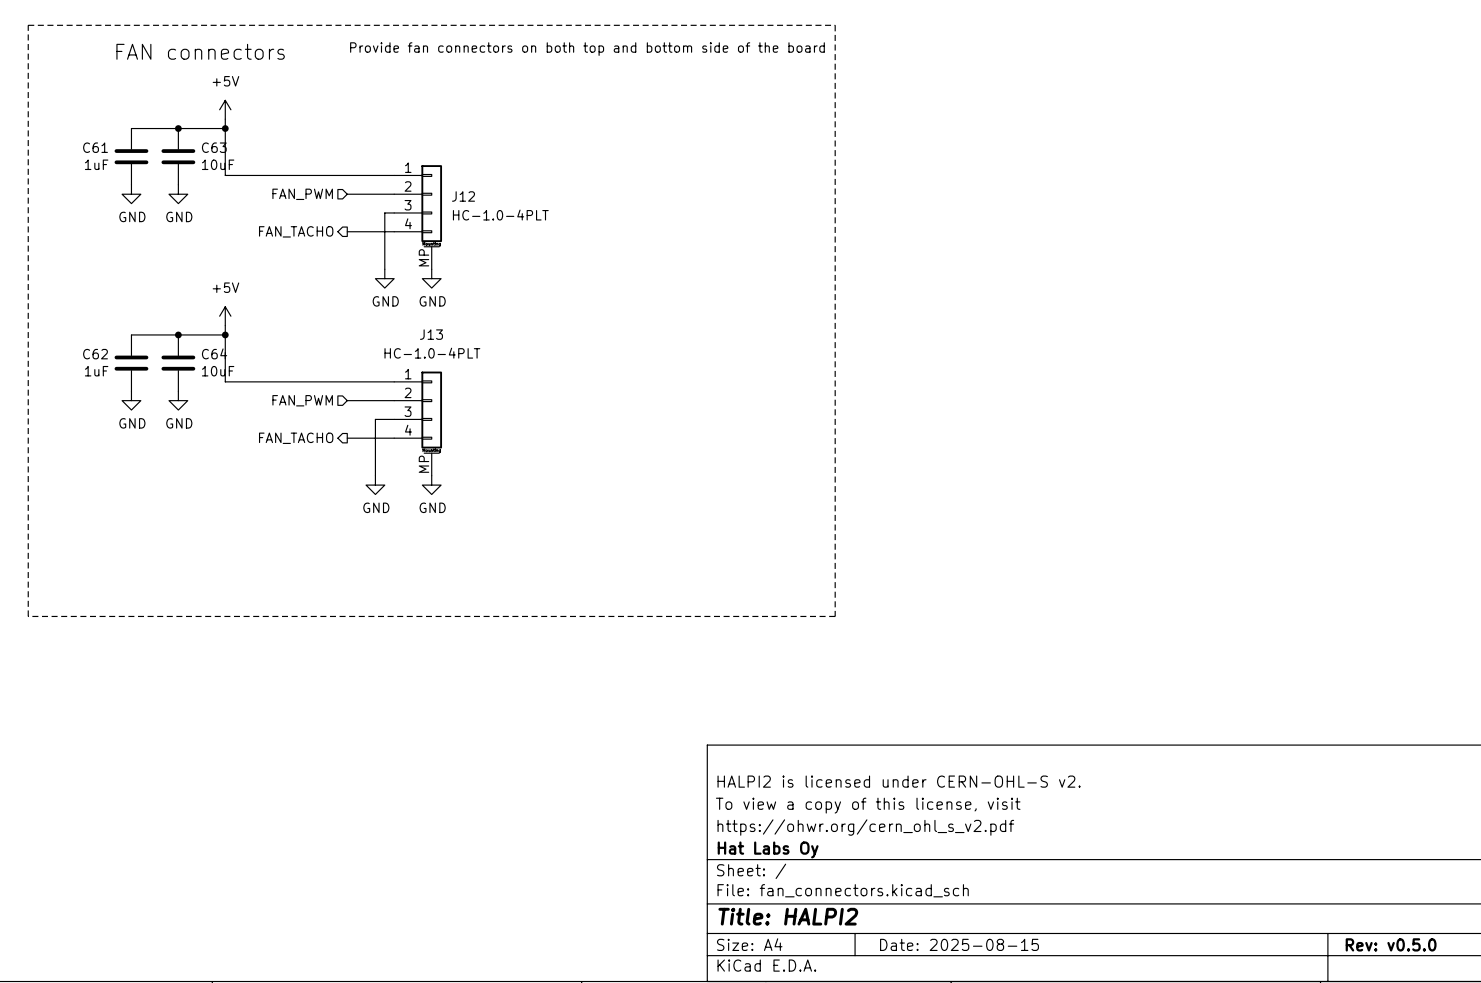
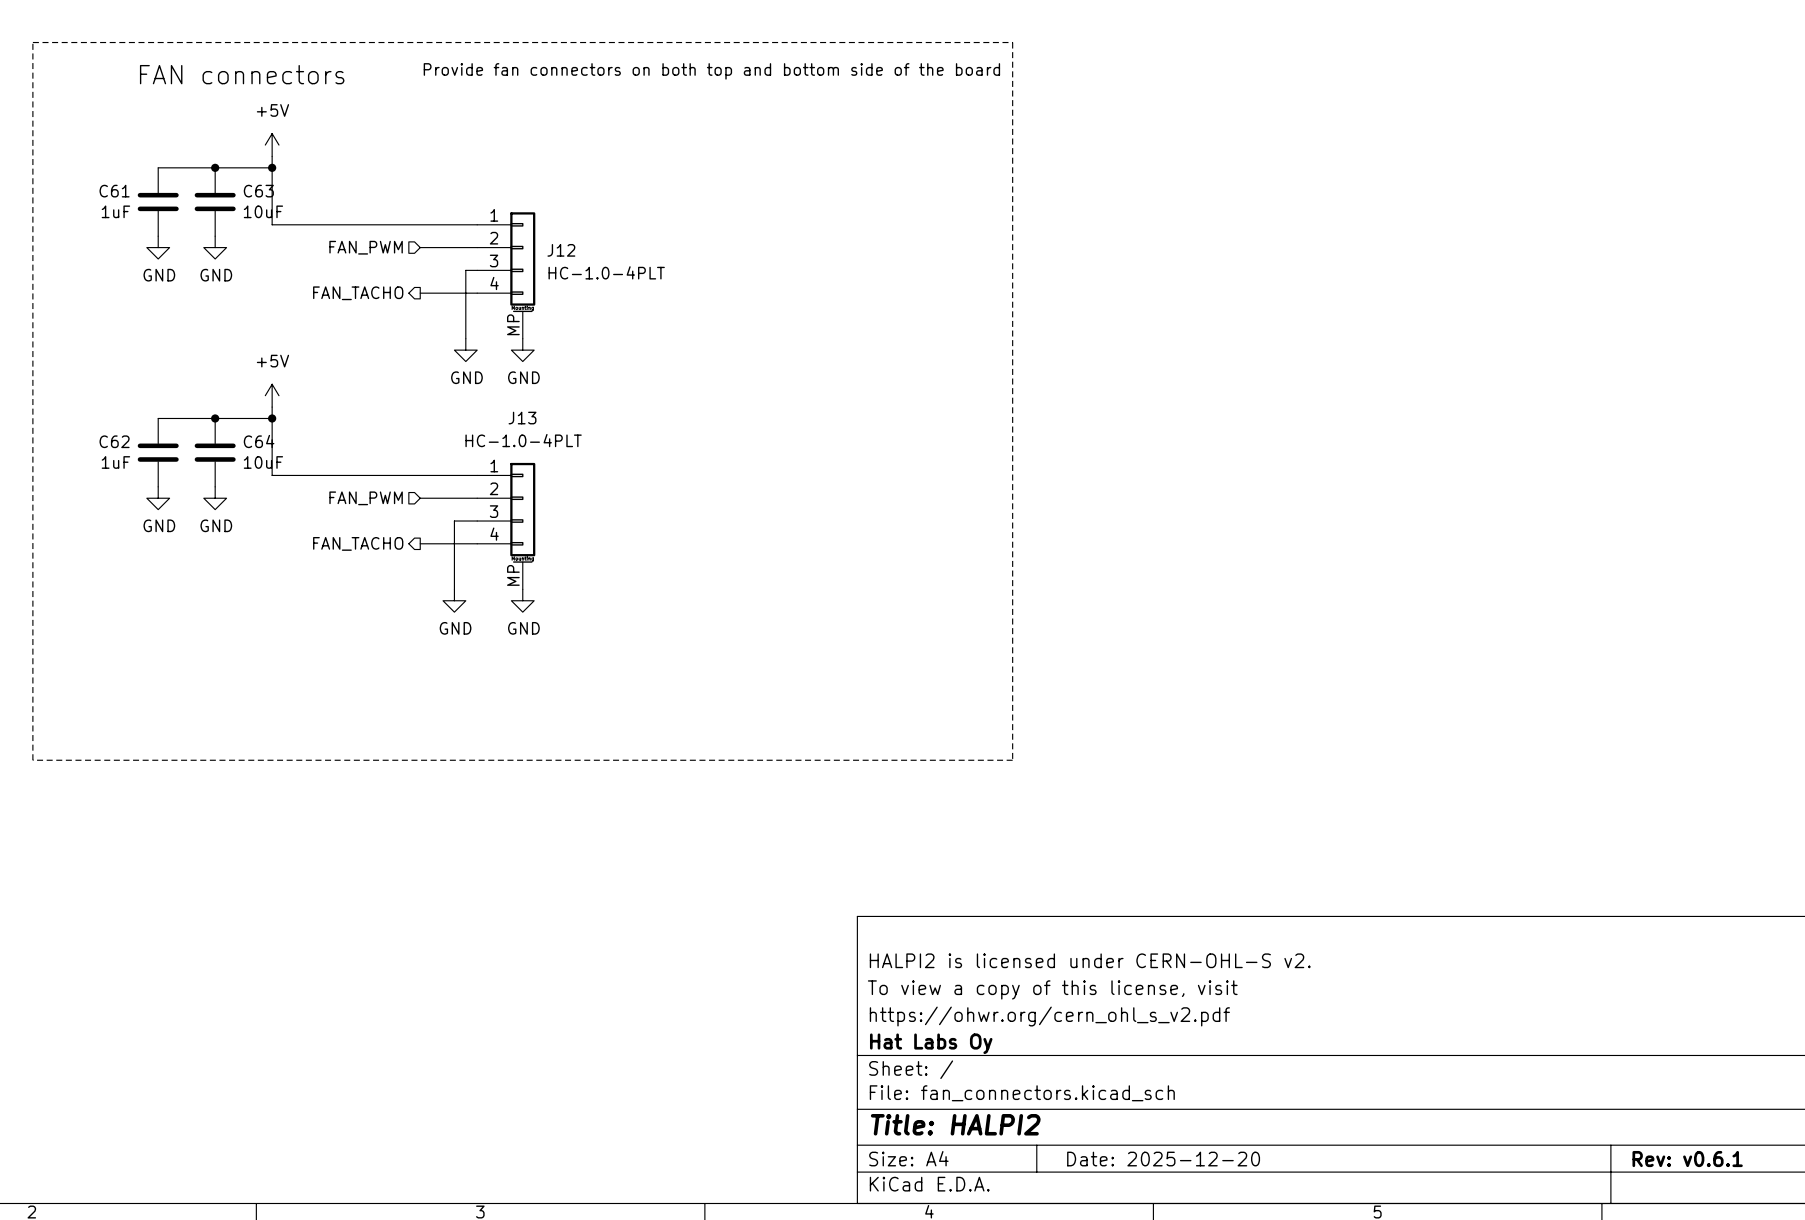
title block: Date: 2025-08-15 (959, 944) -> Date: 2025-12-20 (1163, 1159)
title block: Rev: v0.5.0 (1391, 944) -> Rev: v0.6.1 (1687, 1159)

